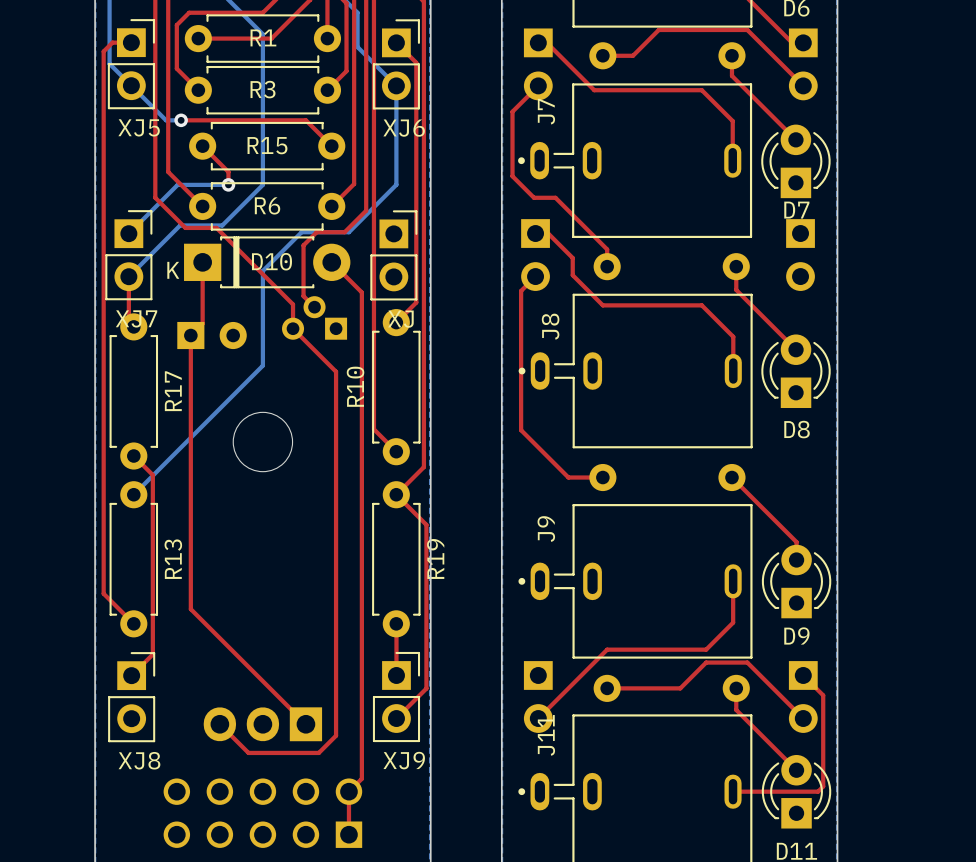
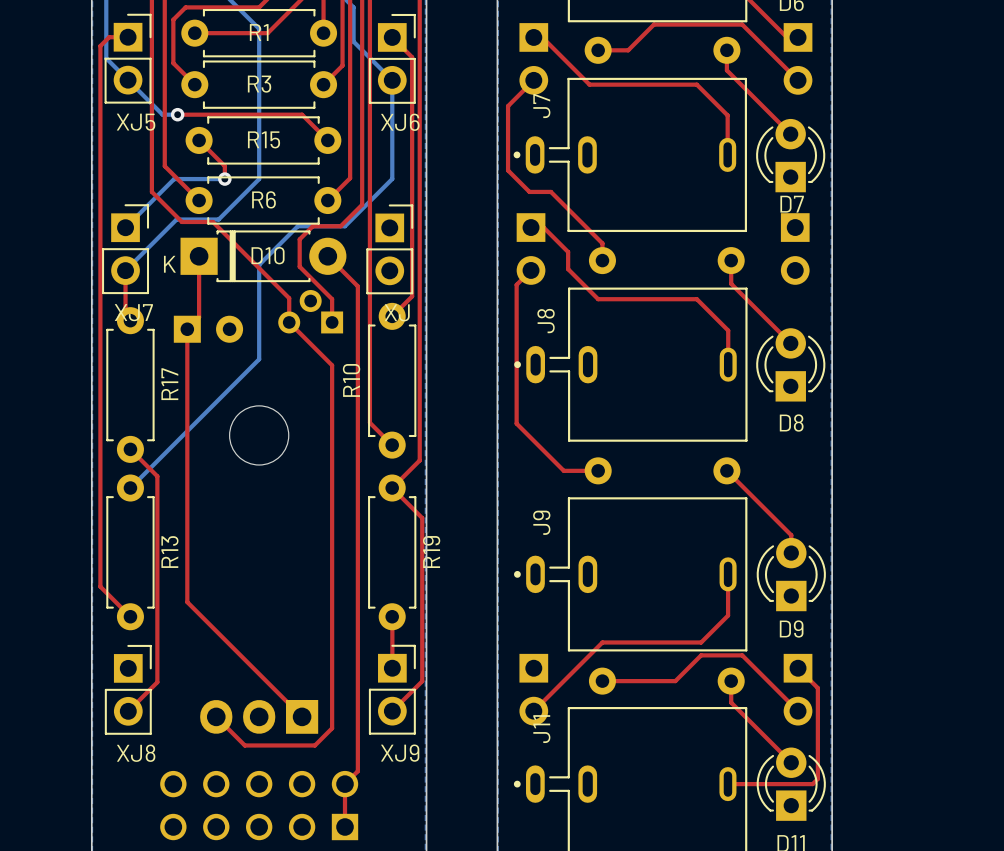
top track: (303, 272) (303, 296) (314, 307) -> (299, 266) (332, 299) (332, 322)
top track: (152, 475) (152, 654) (131, 675) -> (149, 468) (157, 476) (157, 682) (128, 711)

